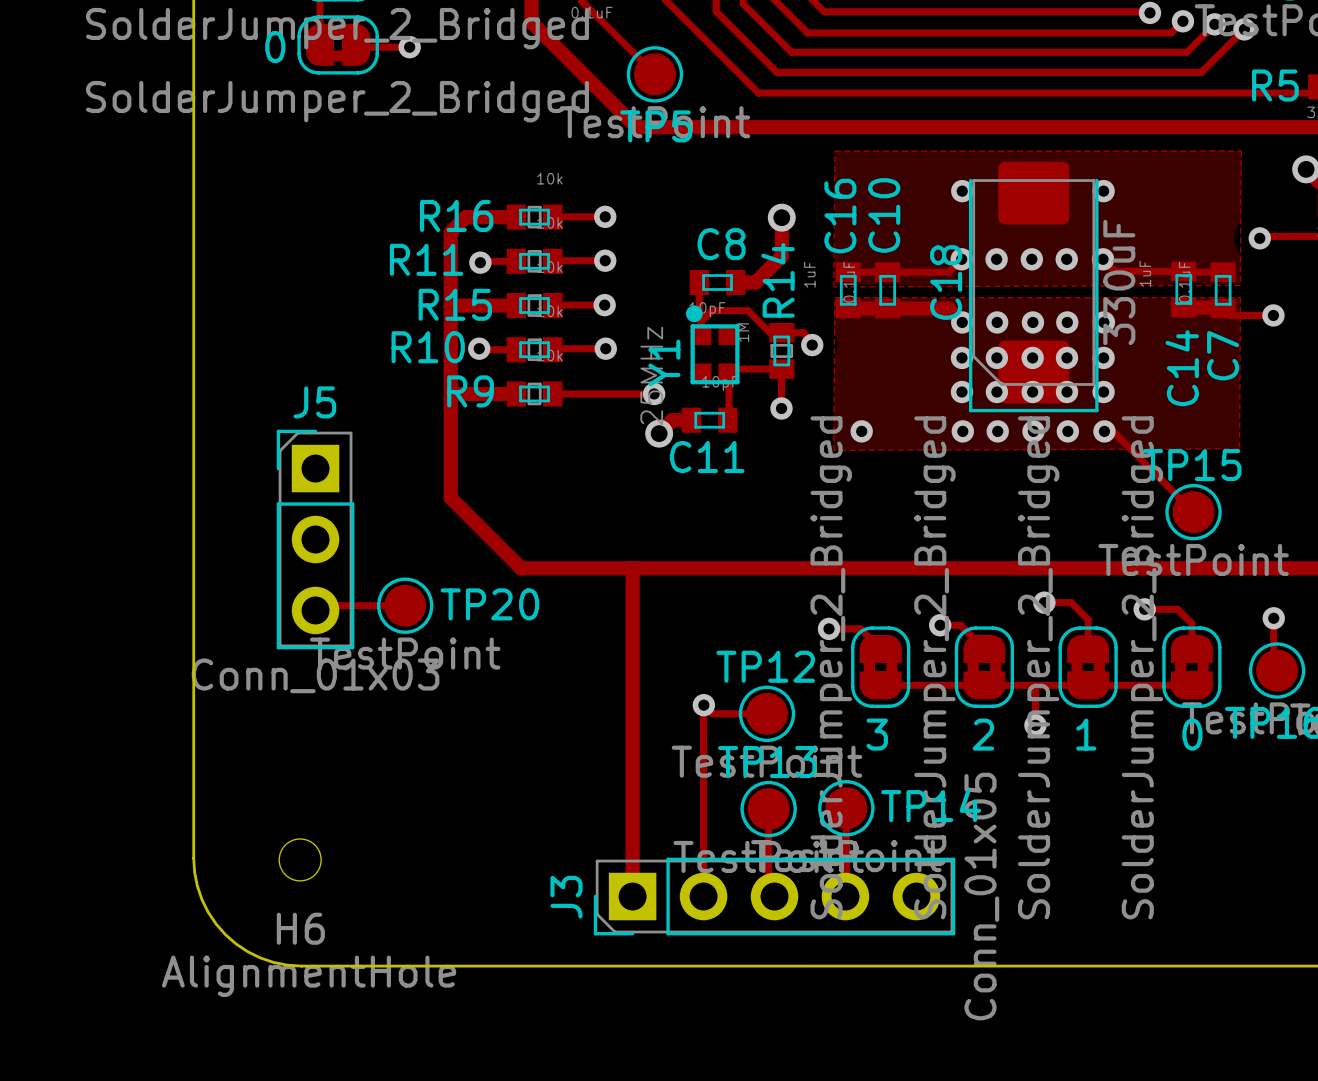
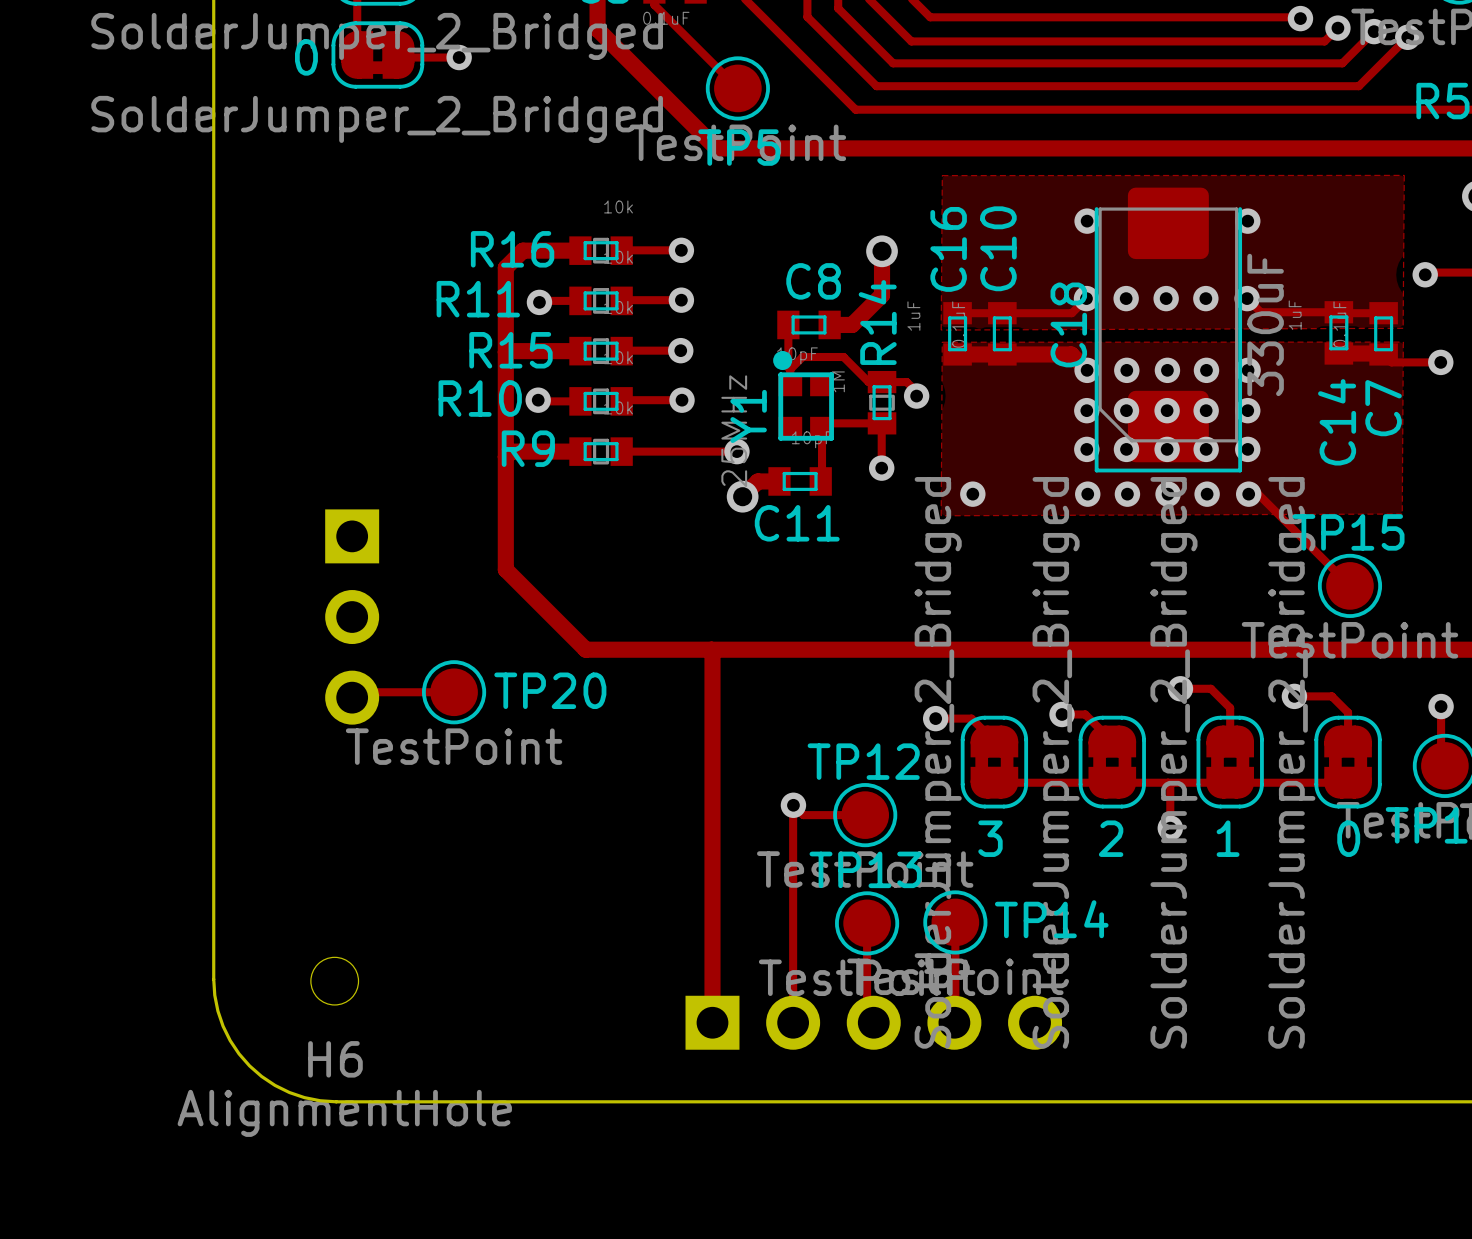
J5 side: top (315, 539) -> bottom (352, 617)
J3 side: top (774, 896) -> bottom (873, 1022)

